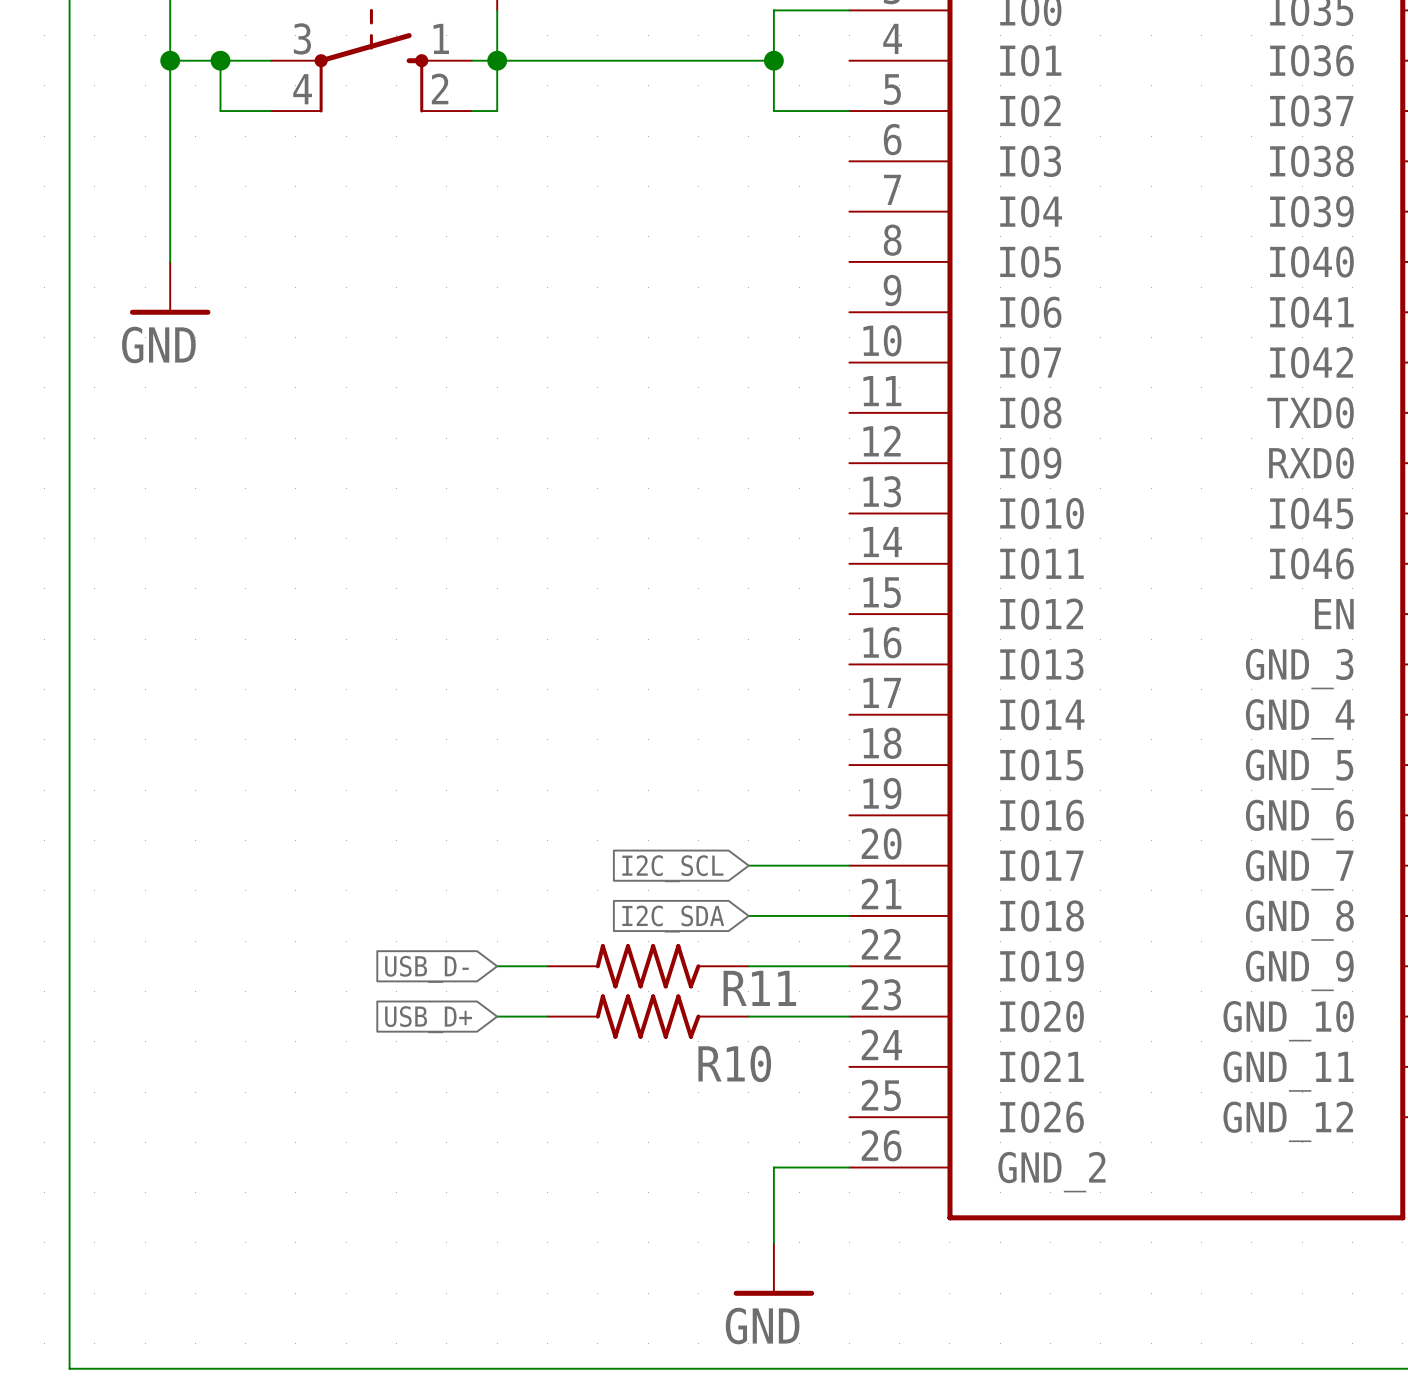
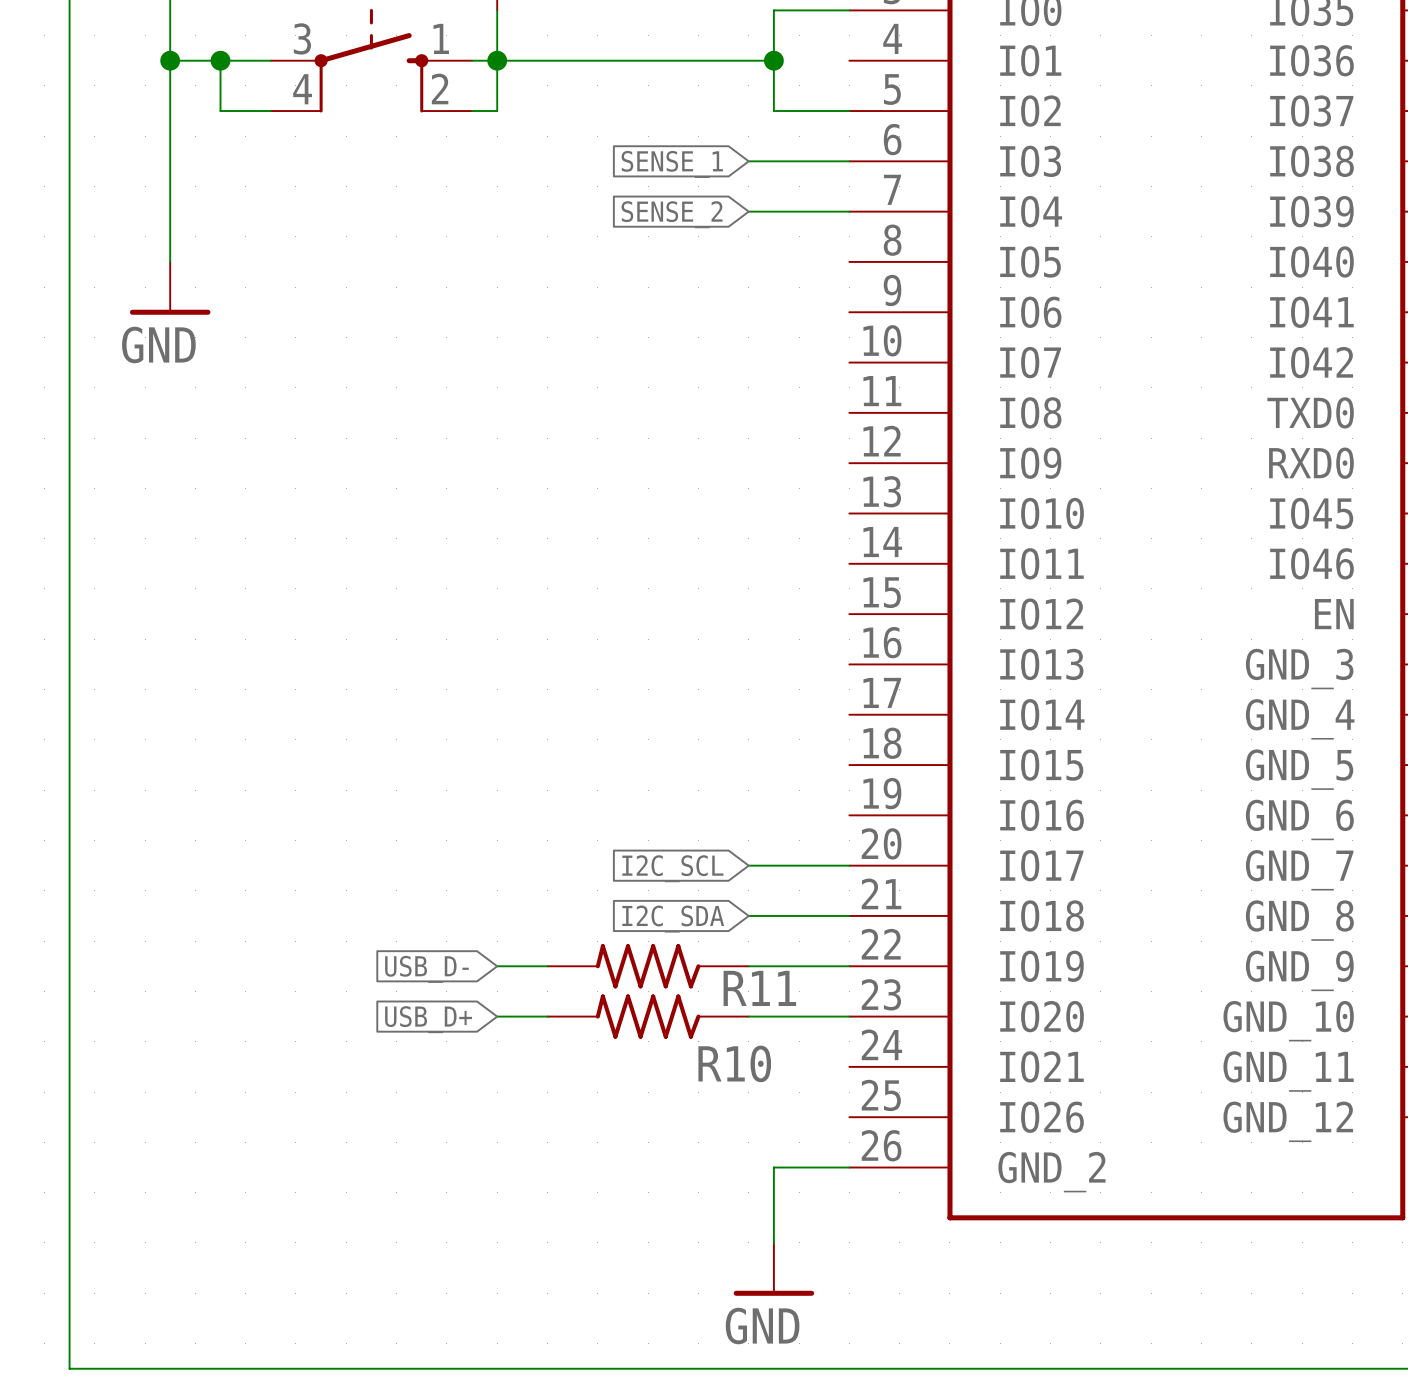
wire: none -> (748, 161) (849, 161)
global label: none -> SENSE_1 (672, 164)
wire: none -> (748, 211) (849, 211)
global label: none -> SENSE_2 (672, 214)

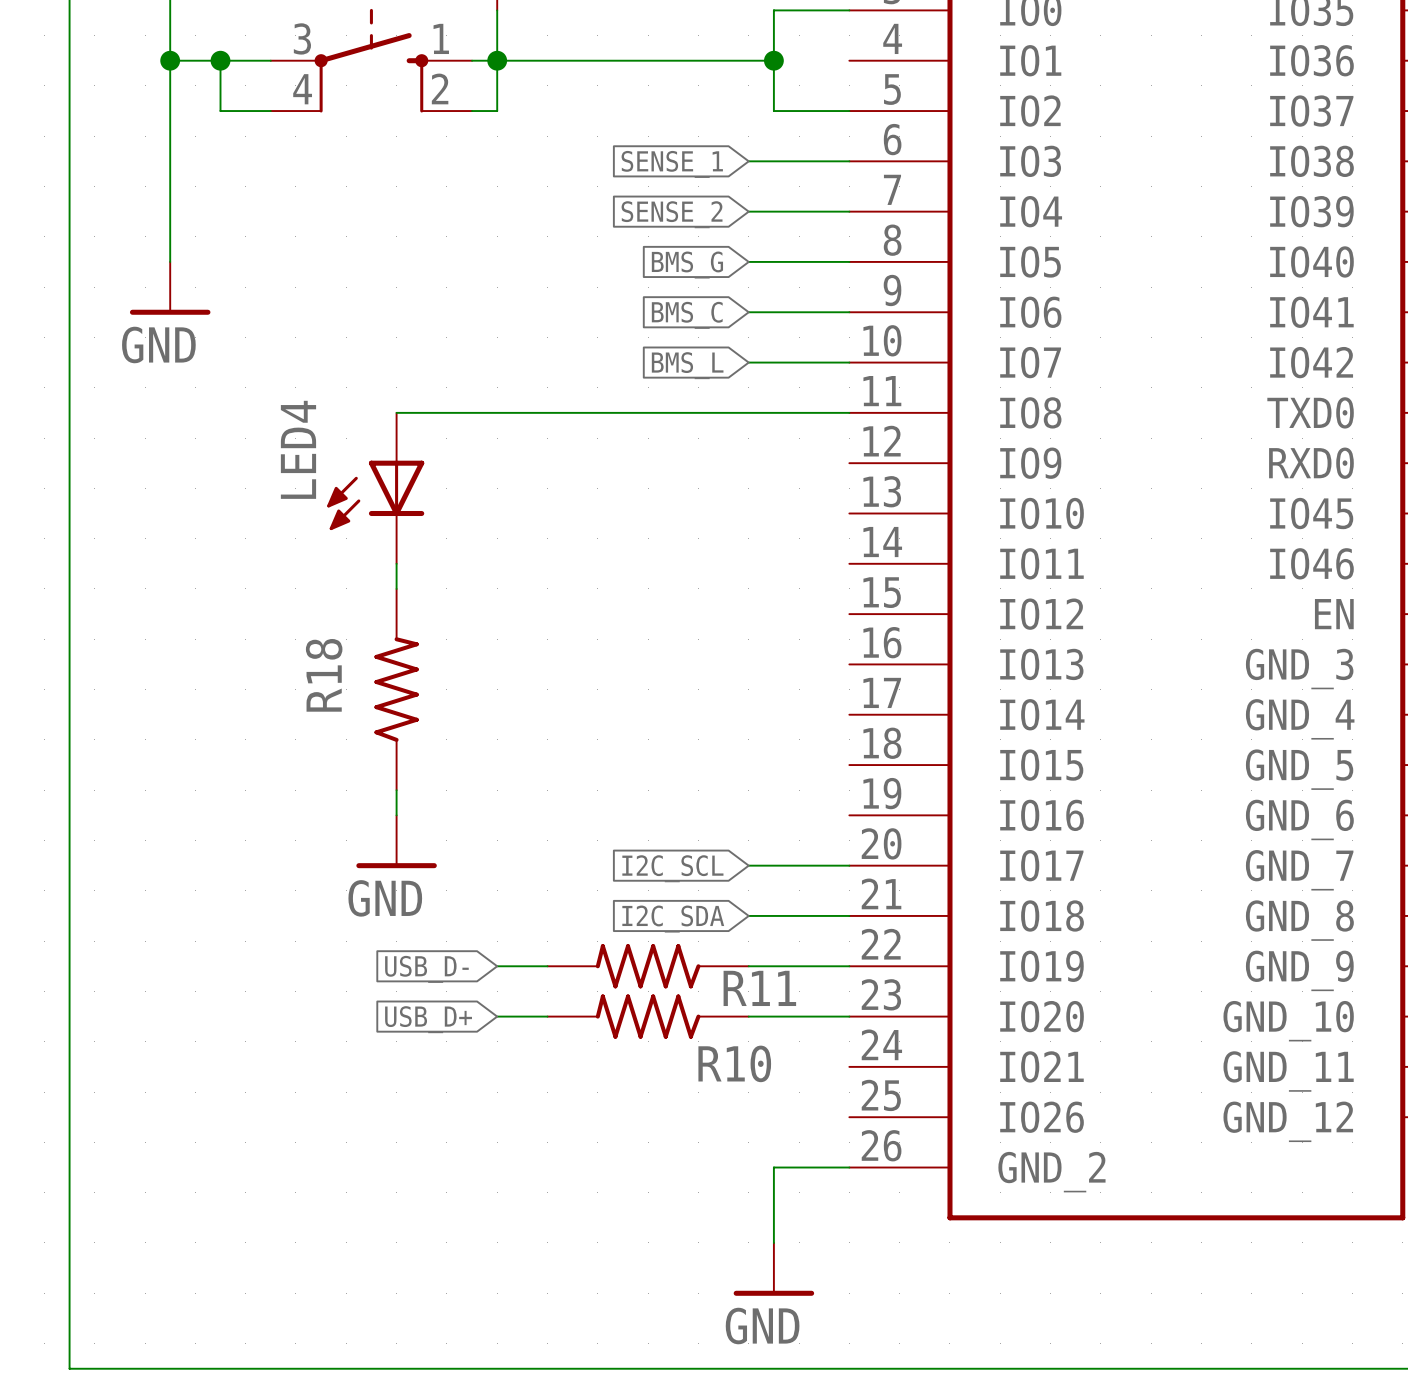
wire: none -> (748, 261) (849, 261)
global label: none -> BMS_G (687, 265)
wire: none -> (748, 312) (849, 312)
global label: none -> BMS_C (687, 315)
wire: none -> (748, 362) (849, 362)
global label: none -> BMS_L (687, 365)
wire: none -> (396, 412) (849, 412)
LED4: none -> (375, 488)
wire: none -> (396, 563) (396, 588)
R18: none -> (396, 689)
wire: none -> (396, 790) (396, 815)
power symbol: none -> GND (396, 841)

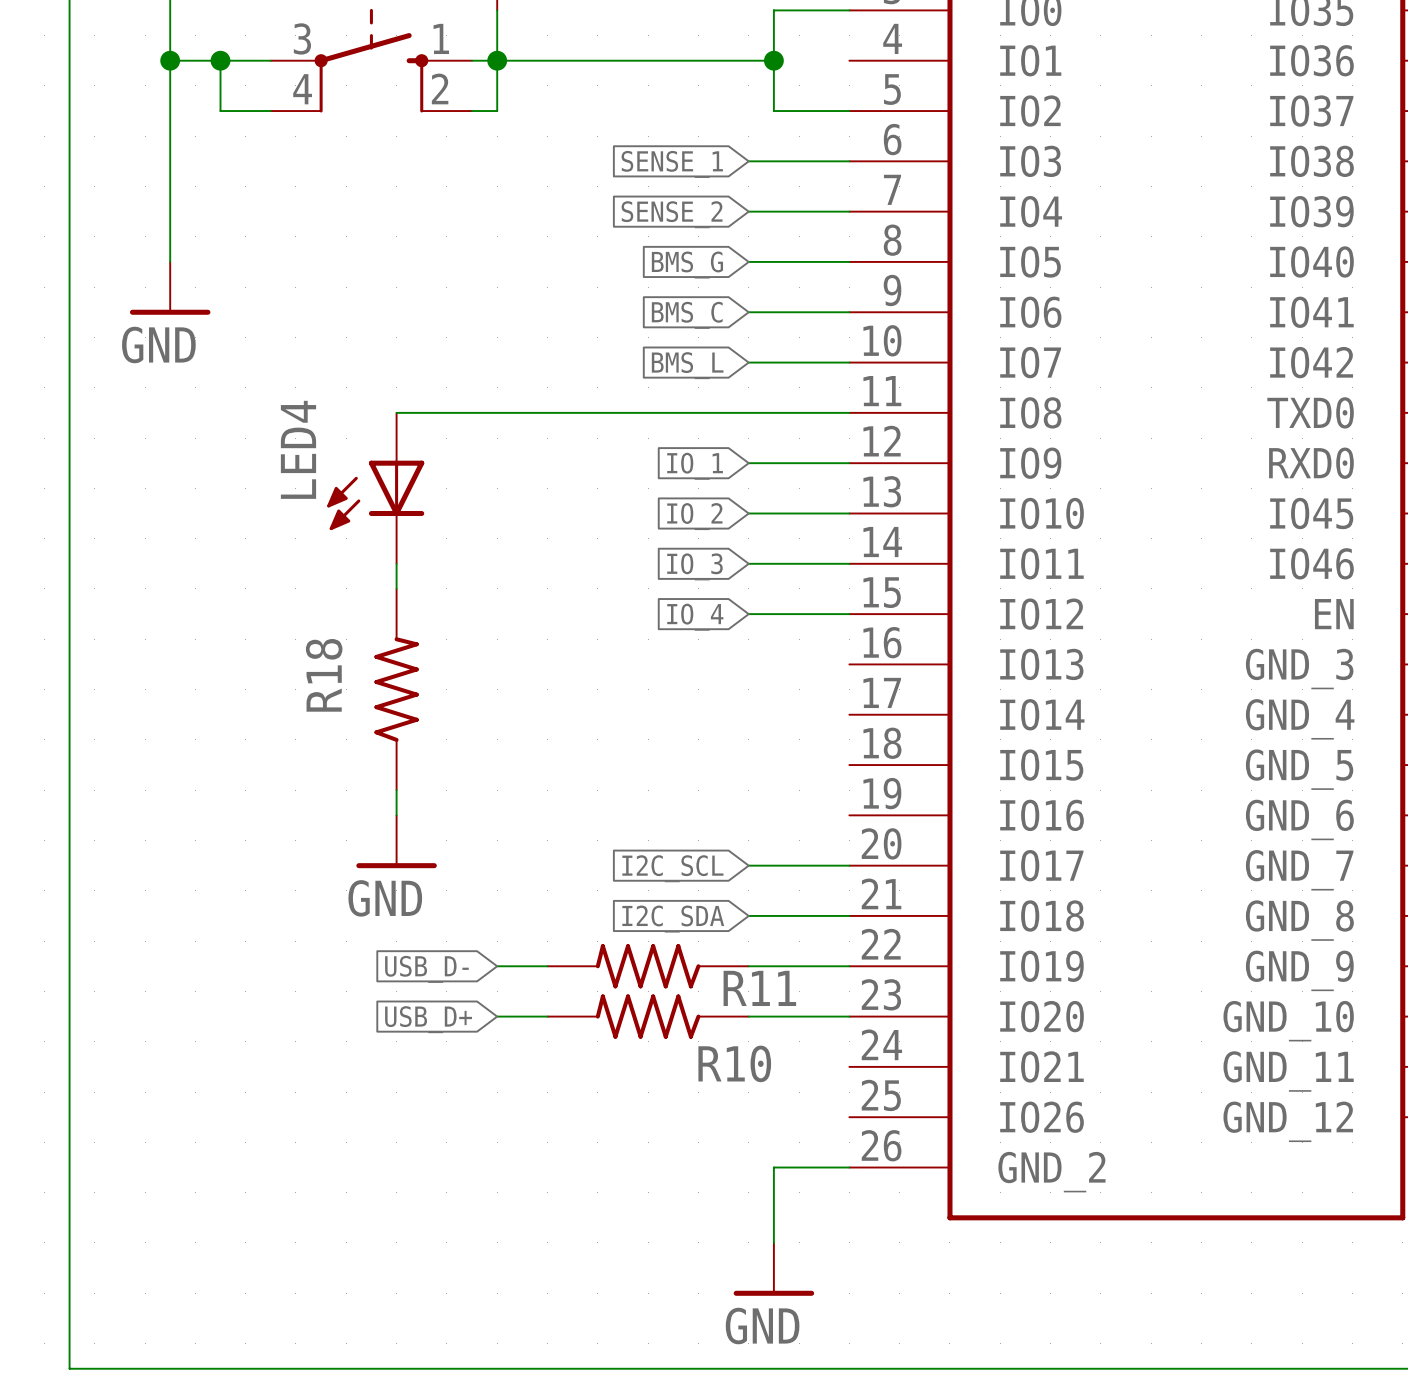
wire: none -> (748, 463) (849, 463)
global label: none -> IO_1 (695, 466)
wire: none -> (748, 513) (849, 513)
global label: none -> IO_2 (694, 516)
wire: none -> (748, 563) (849, 563)
global label: none -> IO_3 (694, 566)
wire: none -> (748, 614) (849, 614)
global label: none -> IO_4 (695, 617)

